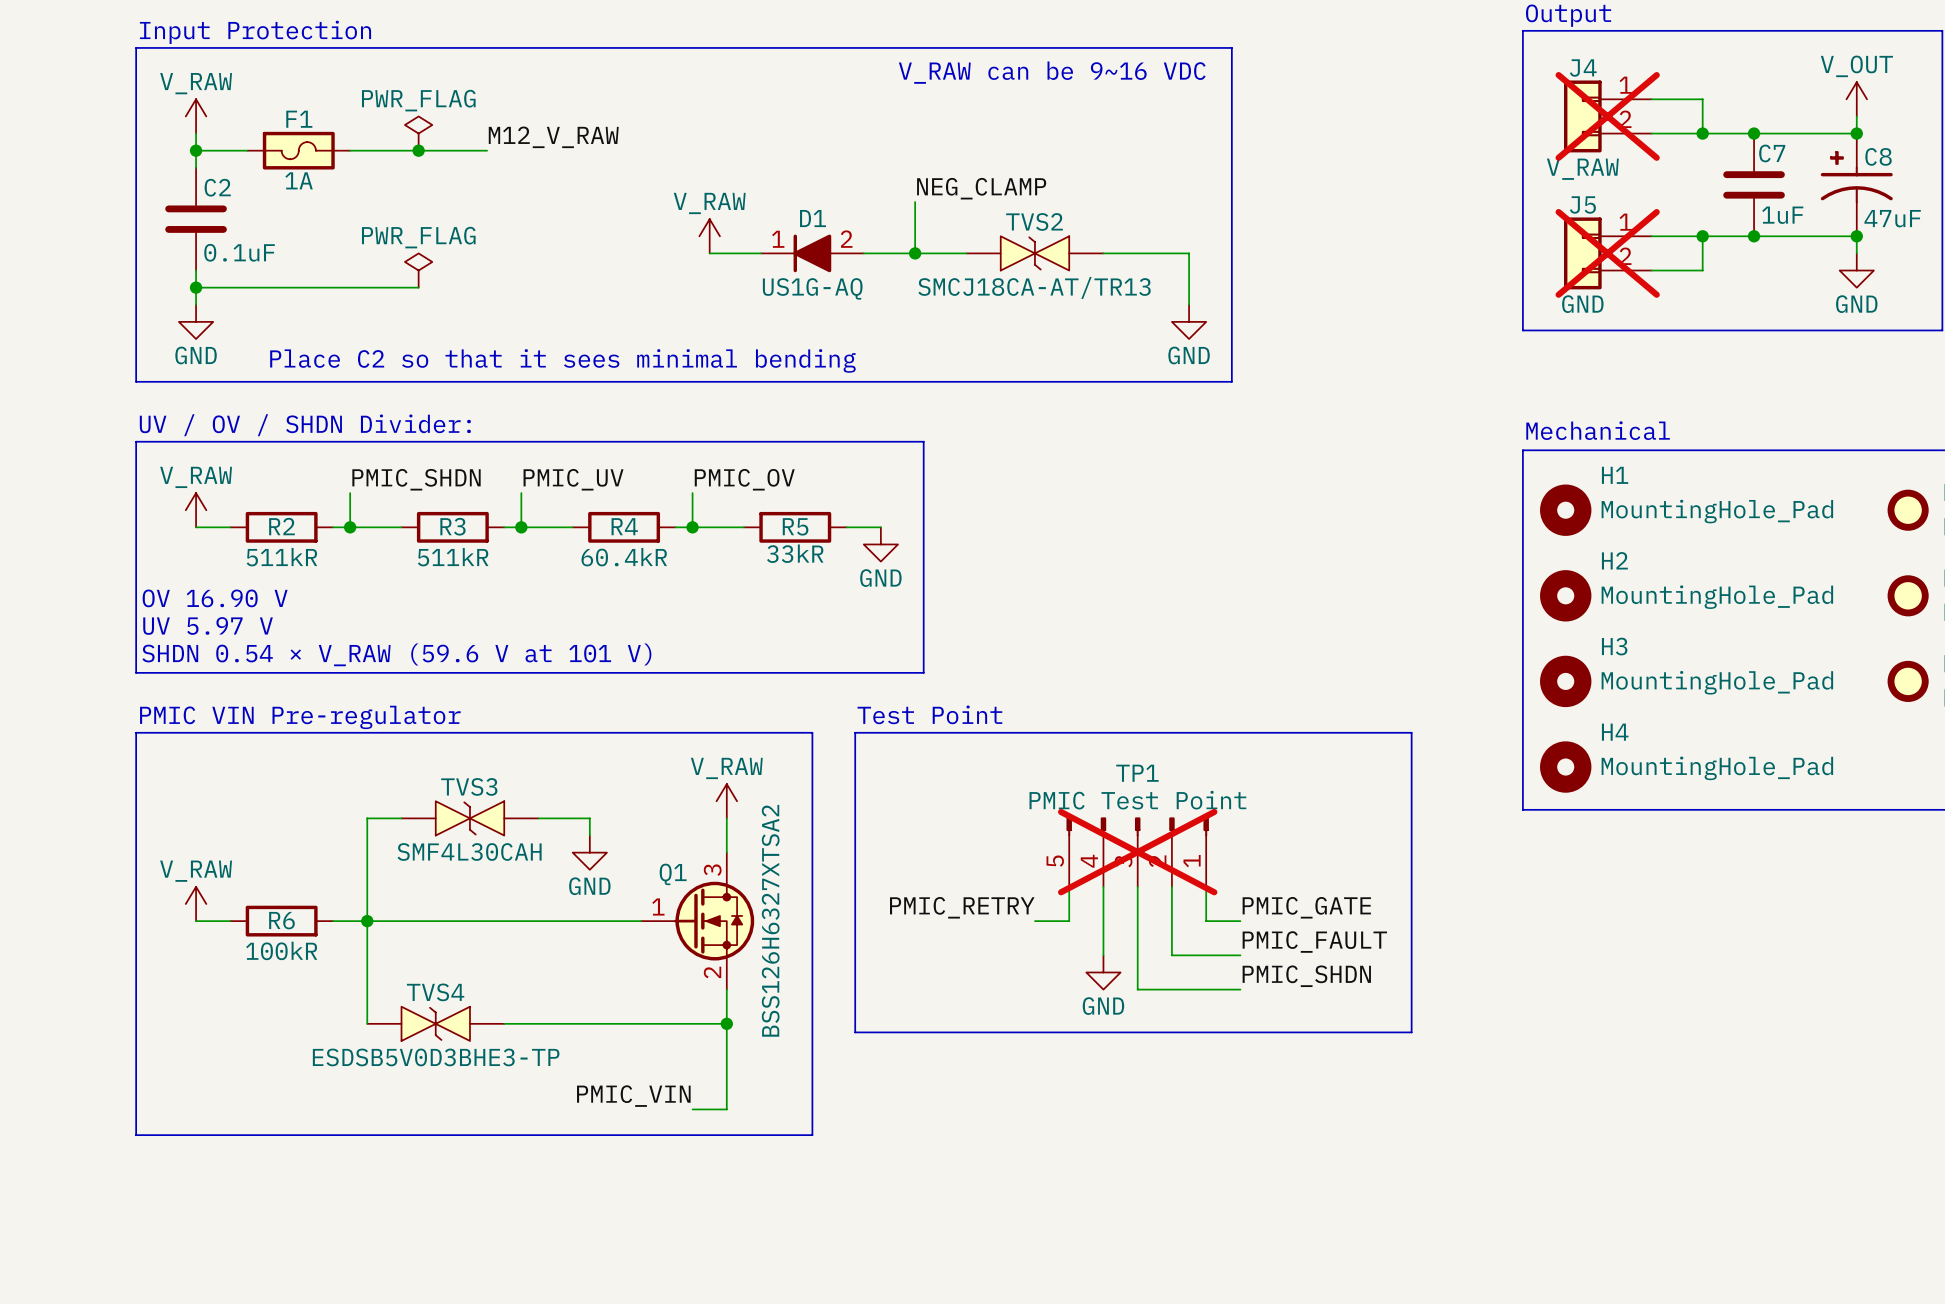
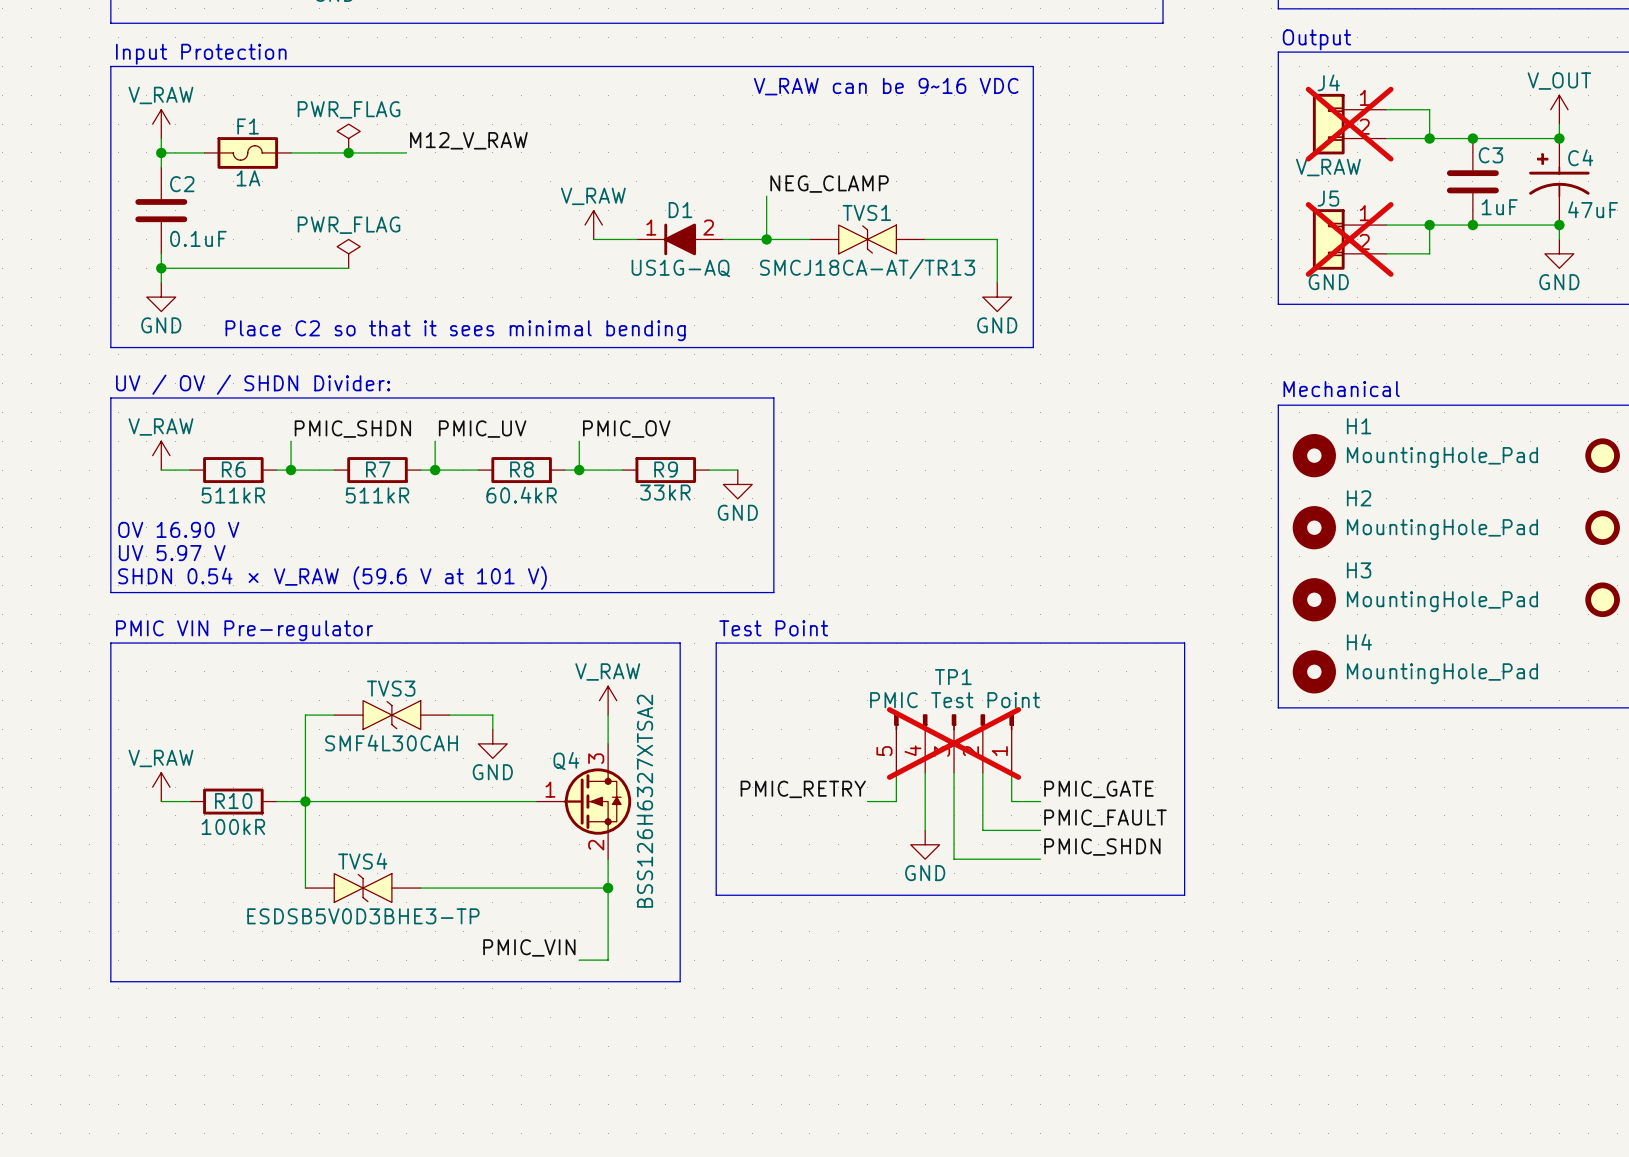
C7 name: C7 (1772, 153) -> C3 (1490, 155)
C8 name: C8 (1878, 156) -> C4 (1580, 157)
TVS2 name: TVS2 (1034, 221) -> TVS1 (866, 212)
R2 name: R2 (281, 526) -> R6 (233, 469)
R3 name: R3 (452, 526) -> R7 (378, 469)
R4 name: R4 (624, 526) -> R8 (521, 469)
R5 name: R5 (795, 526) -> R9 (666, 469)
Q1 name: Q1 (673, 874) -> Q4 (566, 761)
R6 name: R6 (281, 920) -> R10 (233, 801)

